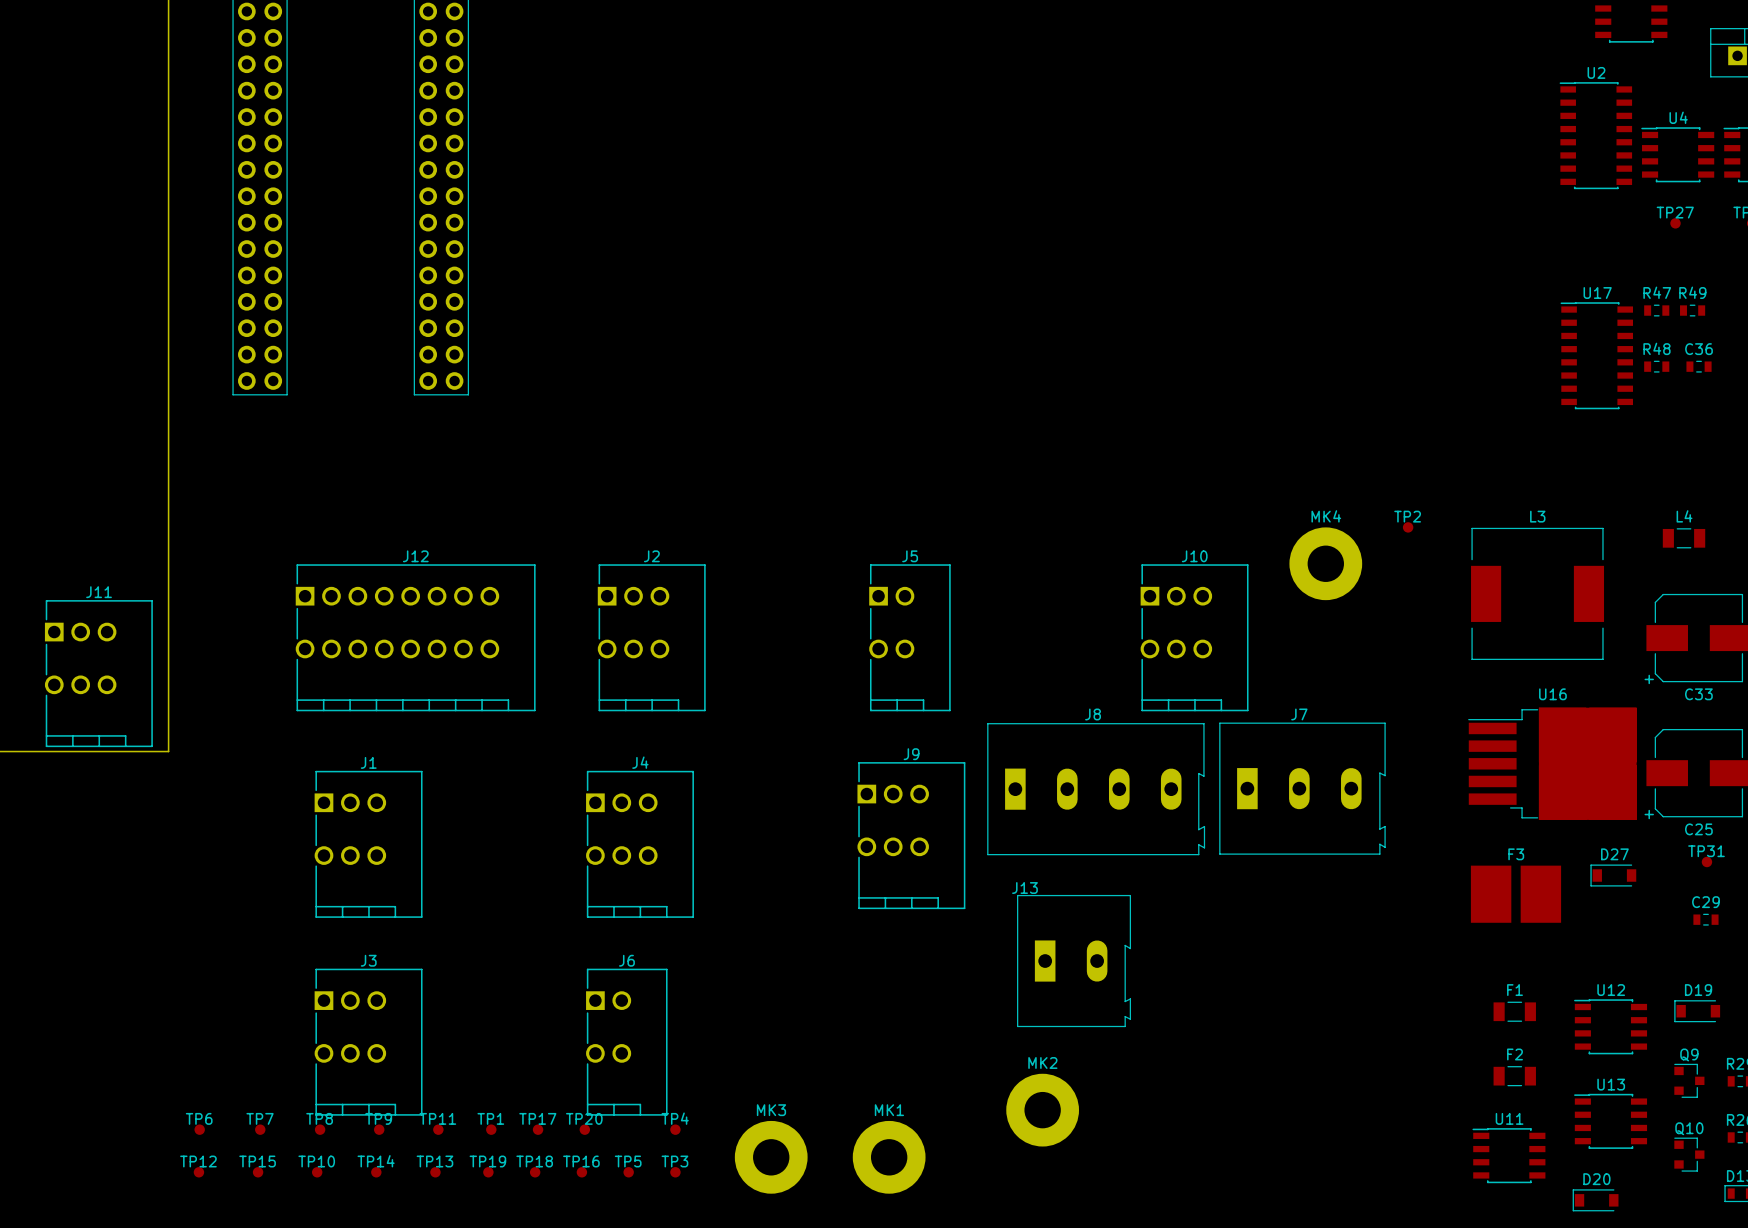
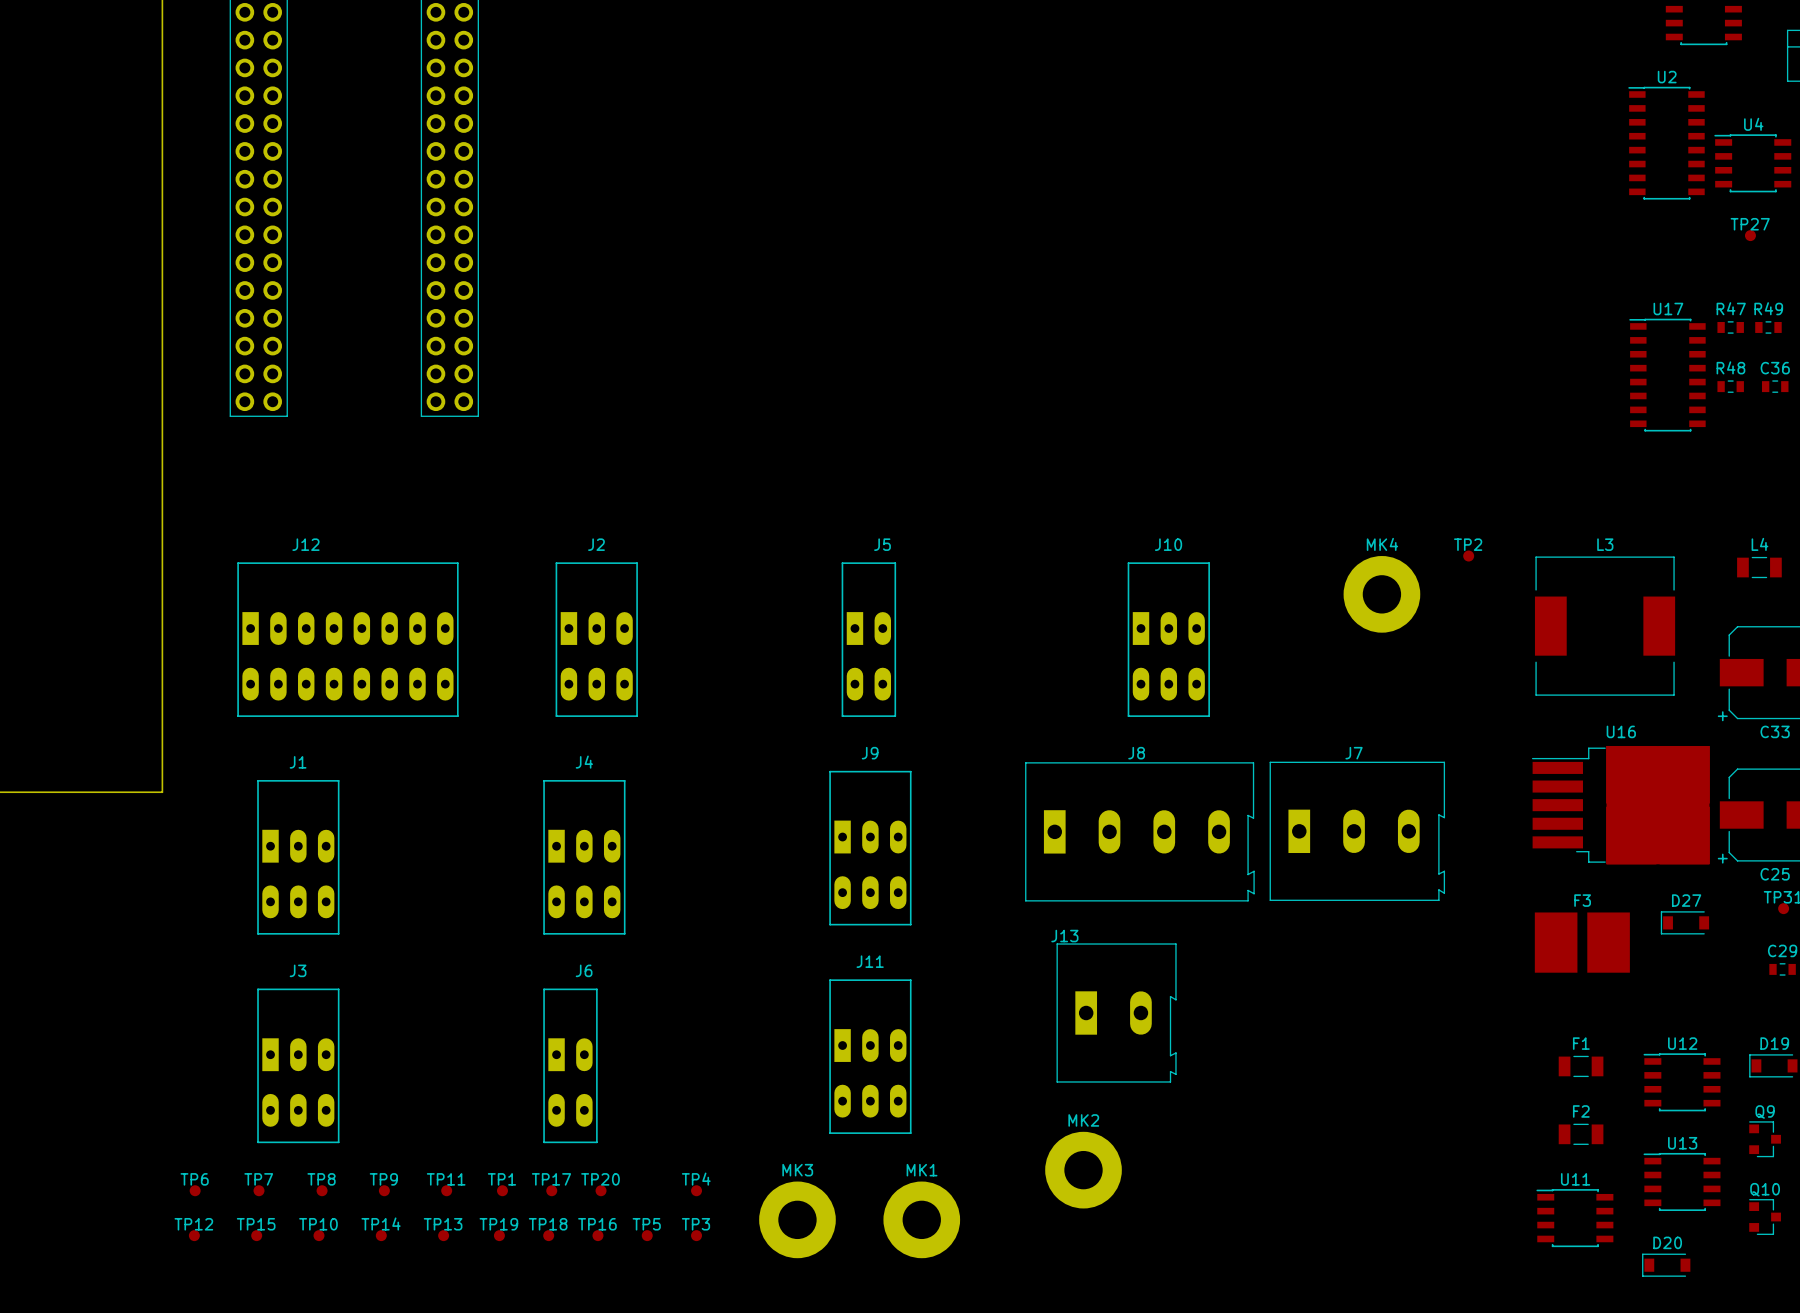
J12 name position: J12 (415, 556) -> J12 (305, 544)
J12 footprint: [295, 564, 536, 712] -> [237, 562, 459, 717]
J2 footprint: [597, 564, 706, 712] -> [555, 562, 638, 717]
J5 footprint: [869, 564, 951, 712] -> [841, 562, 897, 717]
J10 footprint: [1140, 564, 1249, 712] -> [1127, 562, 1210, 717]
J11 footprint: [44, 600, 153, 748] -> [829, 979, 912, 1134]
J9 footprint: [857, 762, 966, 910] -> [829, 770, 912, 926]
J1 footprint: [314, 770, 423, 918] -> [257, 780, 340, 935]
J4 footprint: [586, 770, 694, 918] -> [543, 780, 626, 935]
J3 footprint: [314, 968, 423, 1116] -> [257, 988, 340, 1144]
J6 footprint: [586, 968, 668, 1116] -> [543, 988, 598, 1144]

